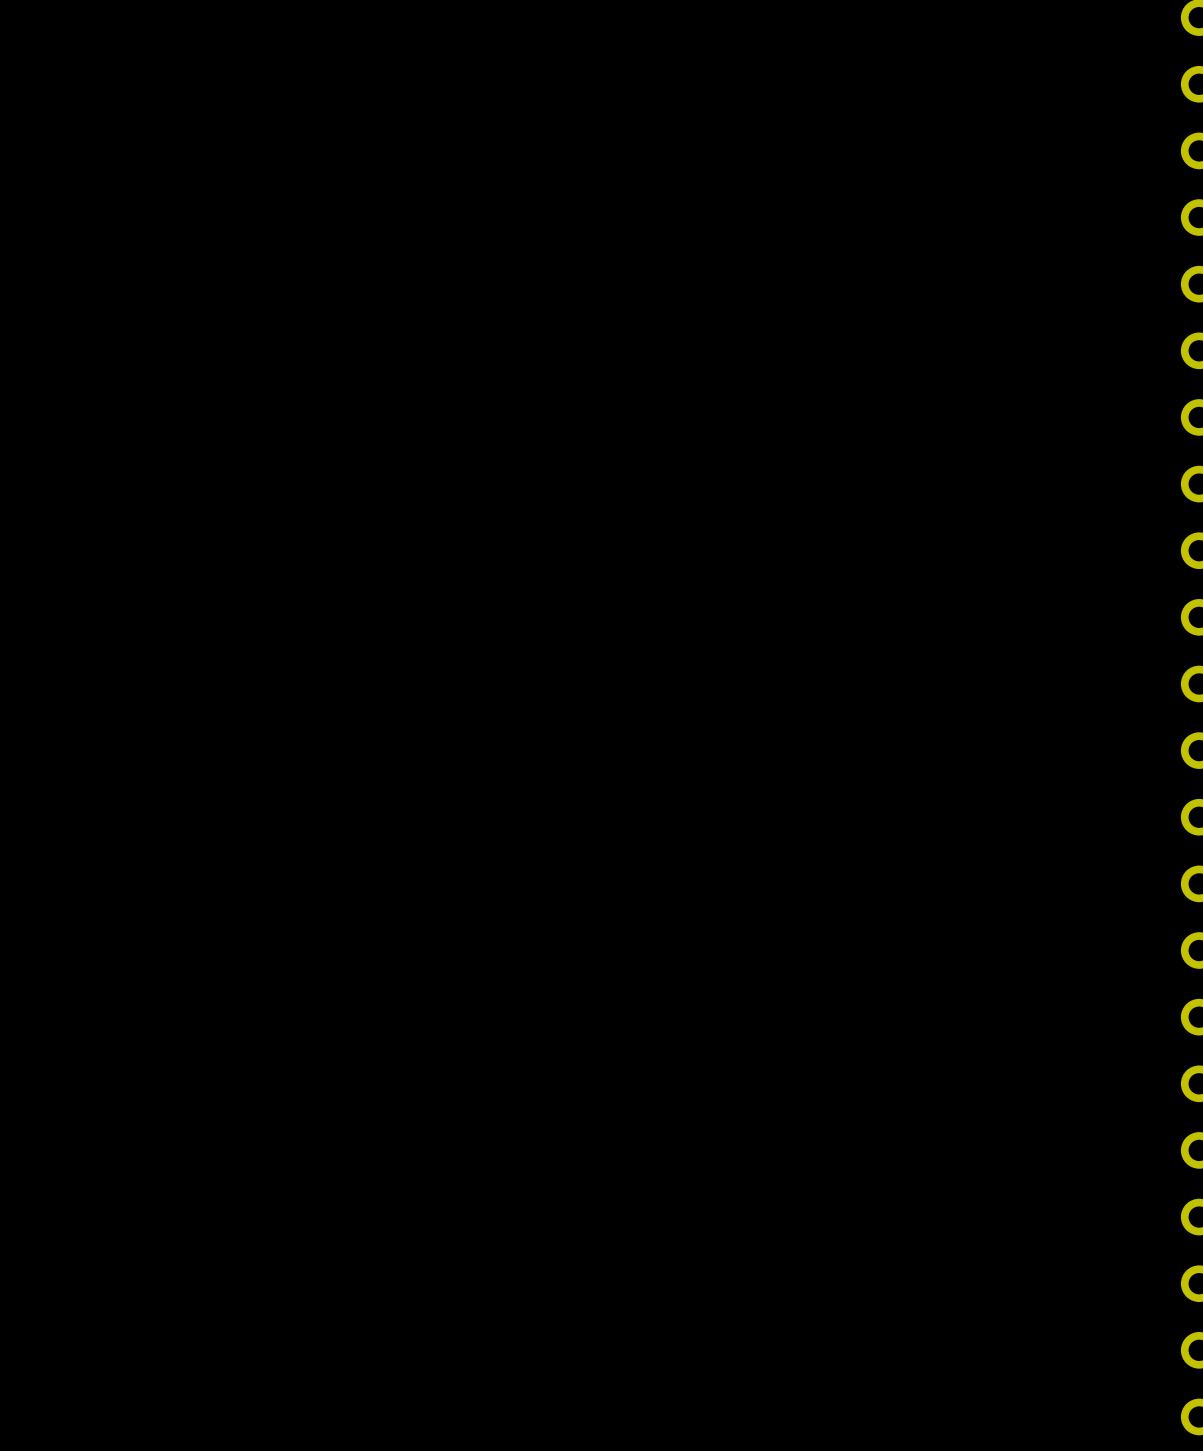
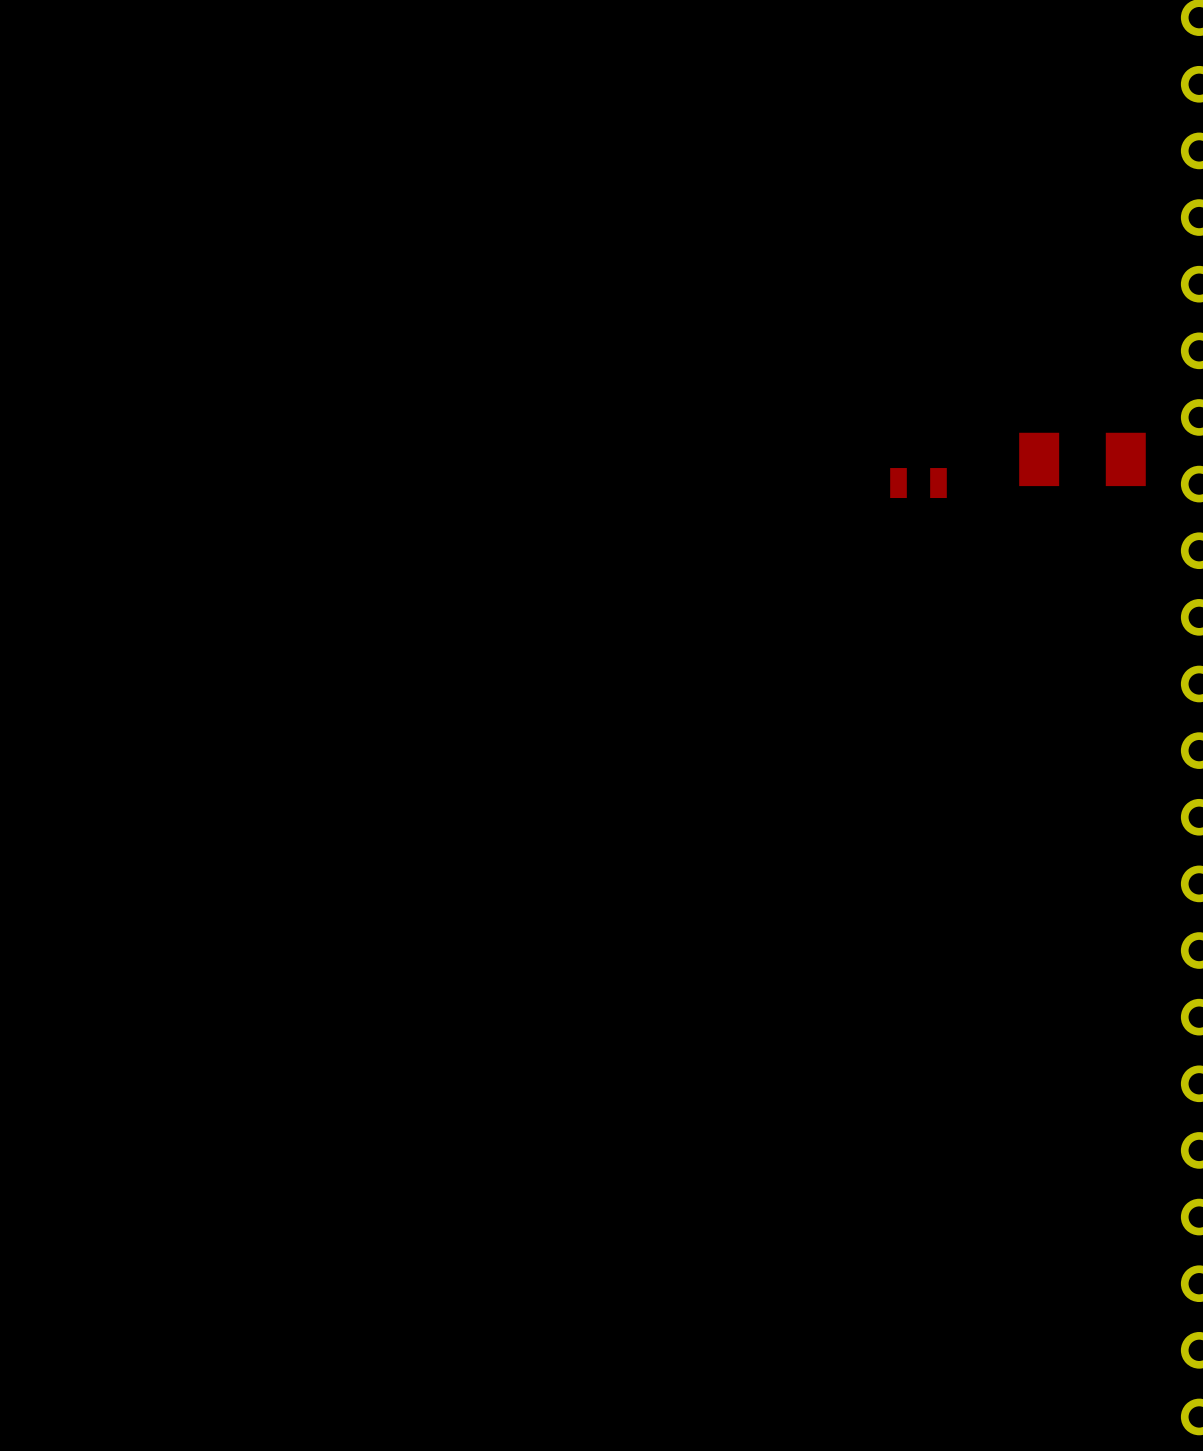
part: none -> (1082, 459)
part: none -> (918, 483)

